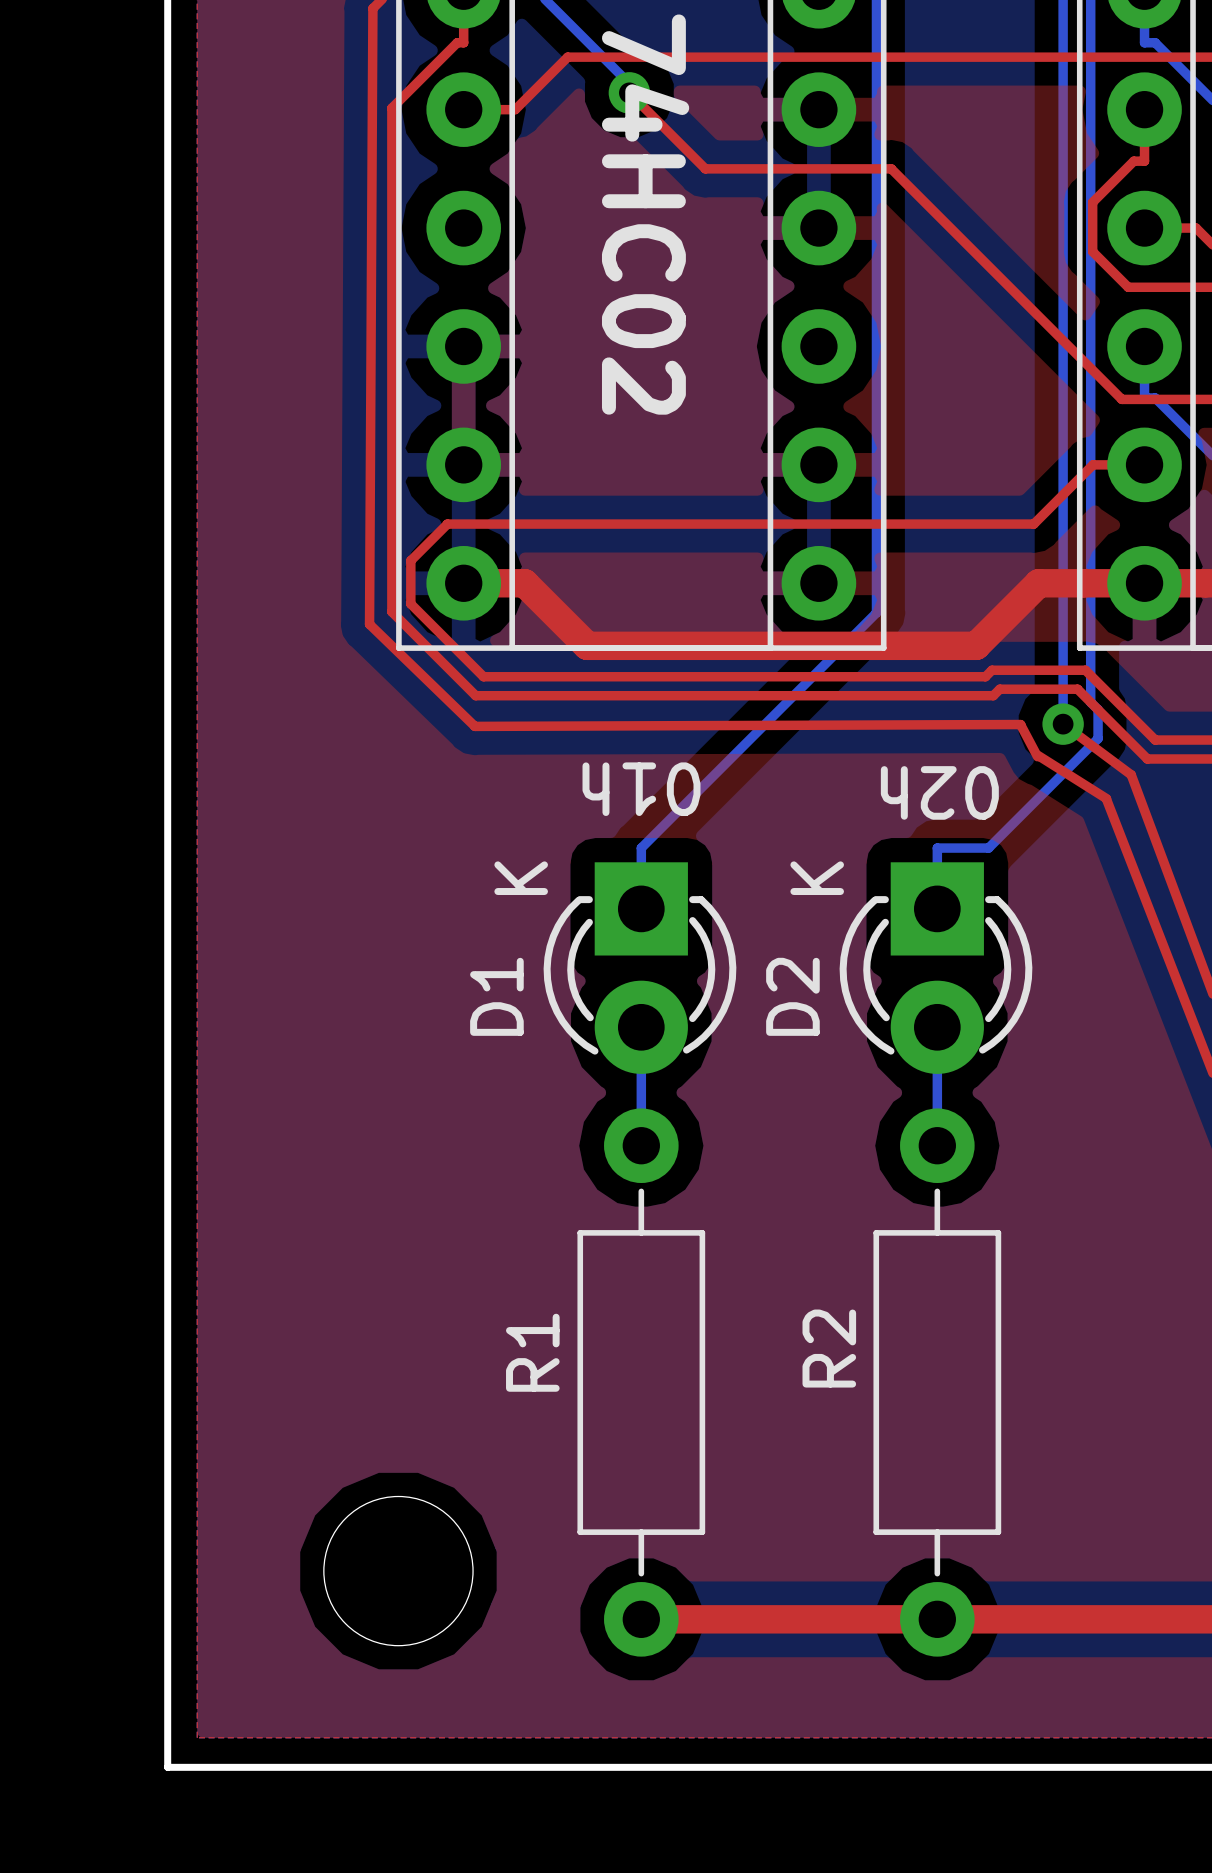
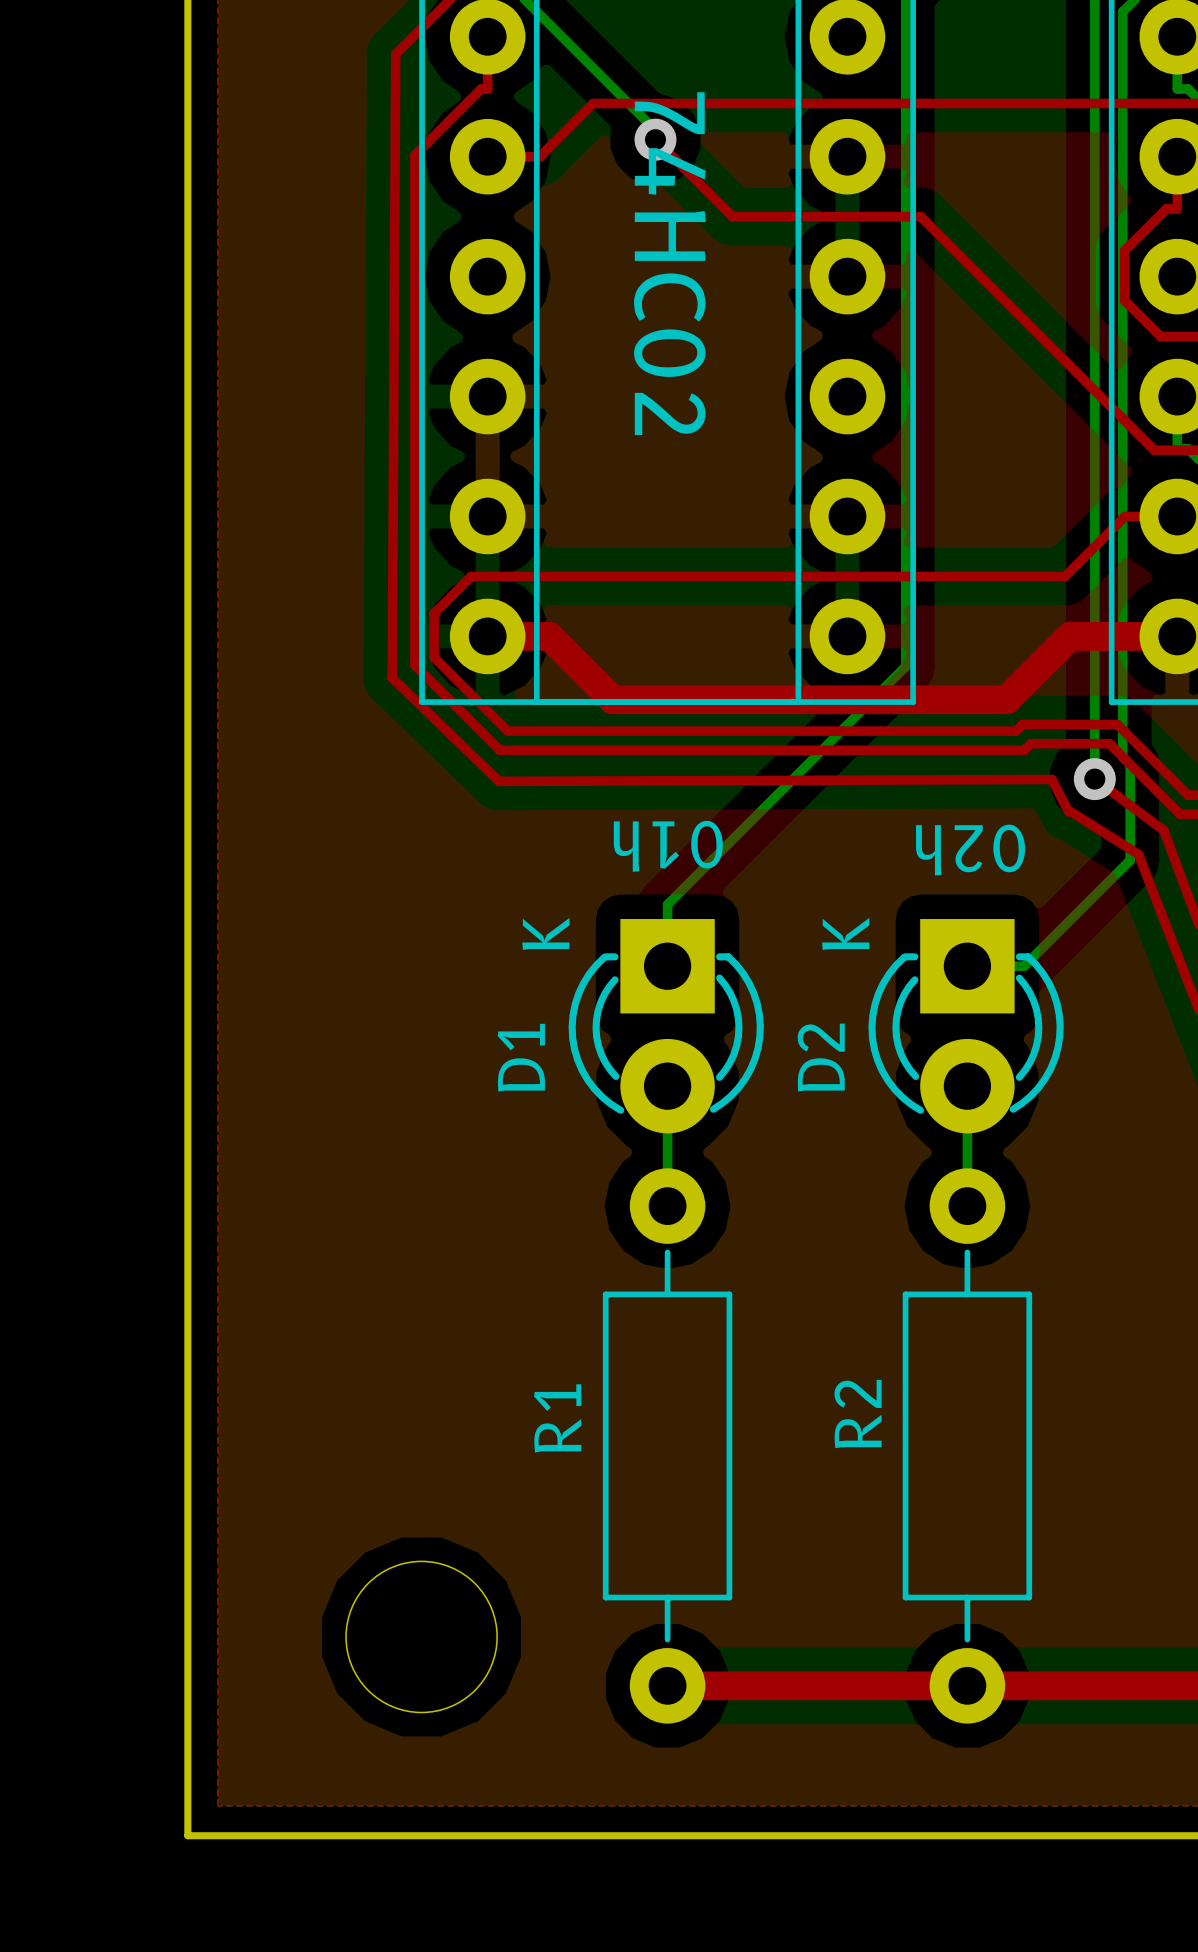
bottom track: (1098, 738) (988, 848) (937, 848) (937, 908) -> (1130, 793) (1130, 860) (1024, 966) (967, 966)

